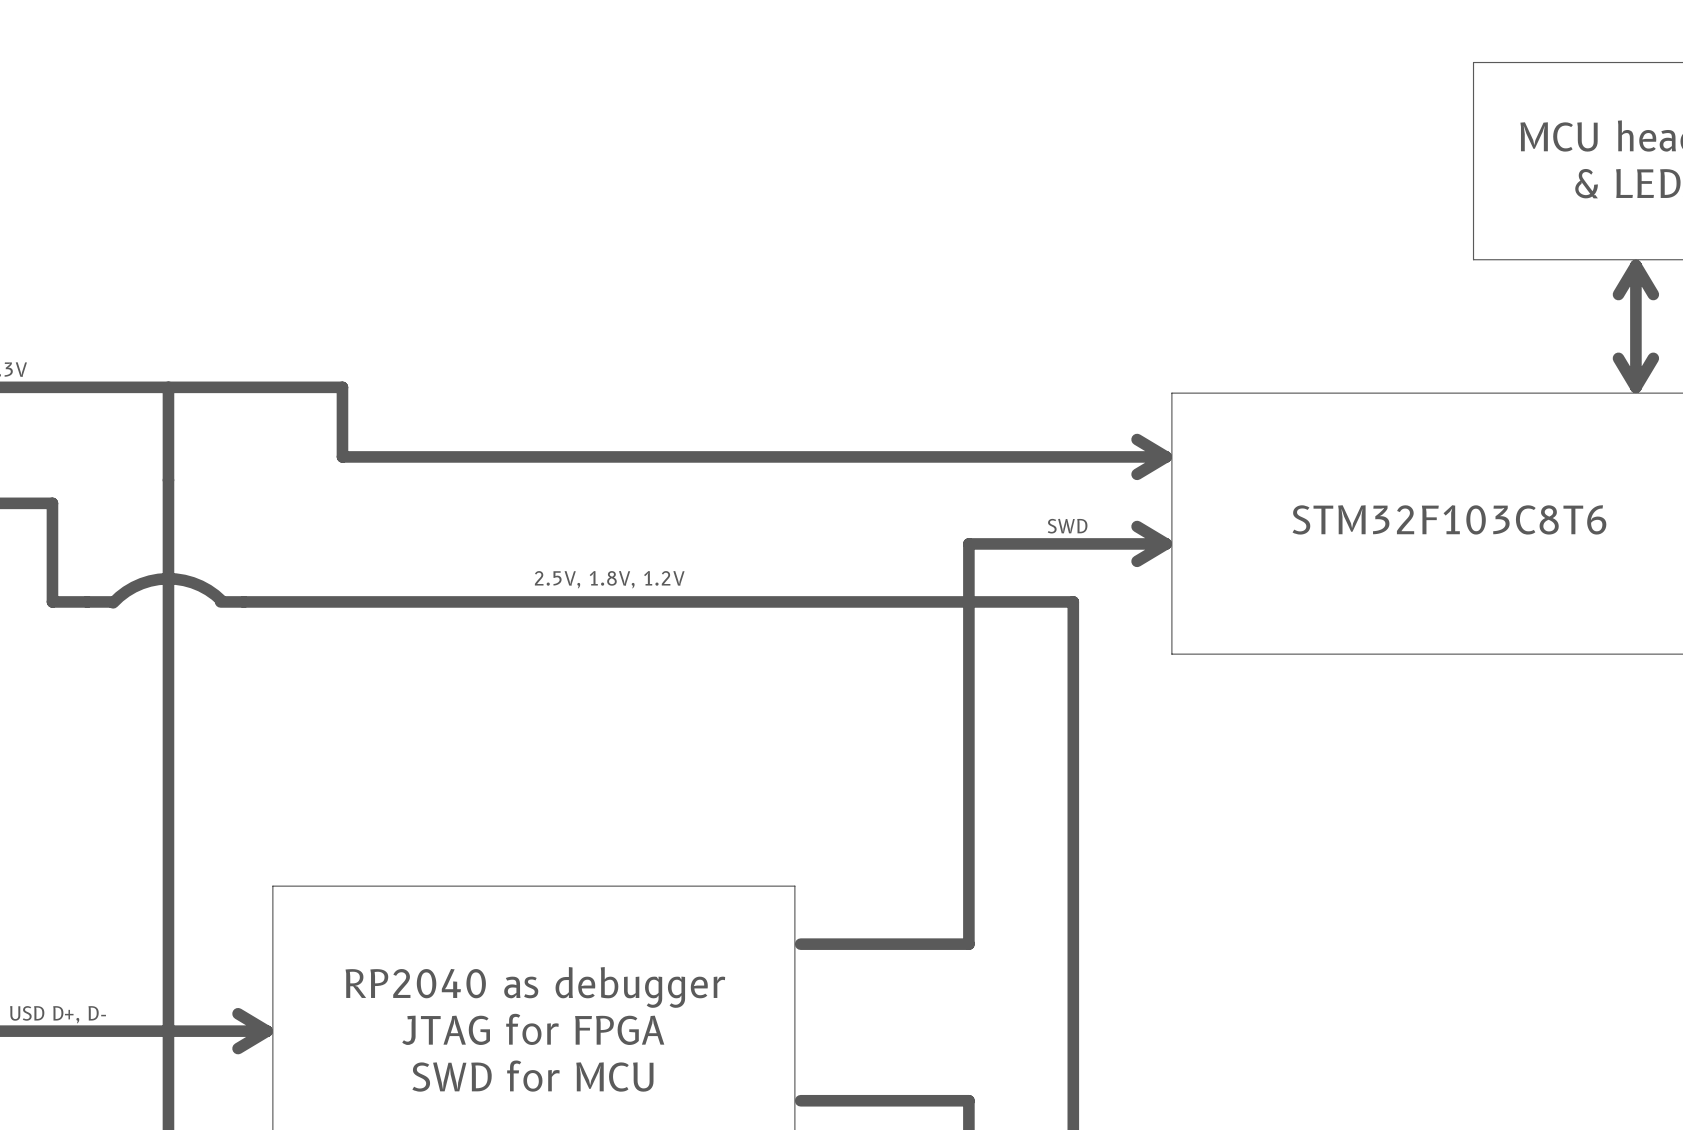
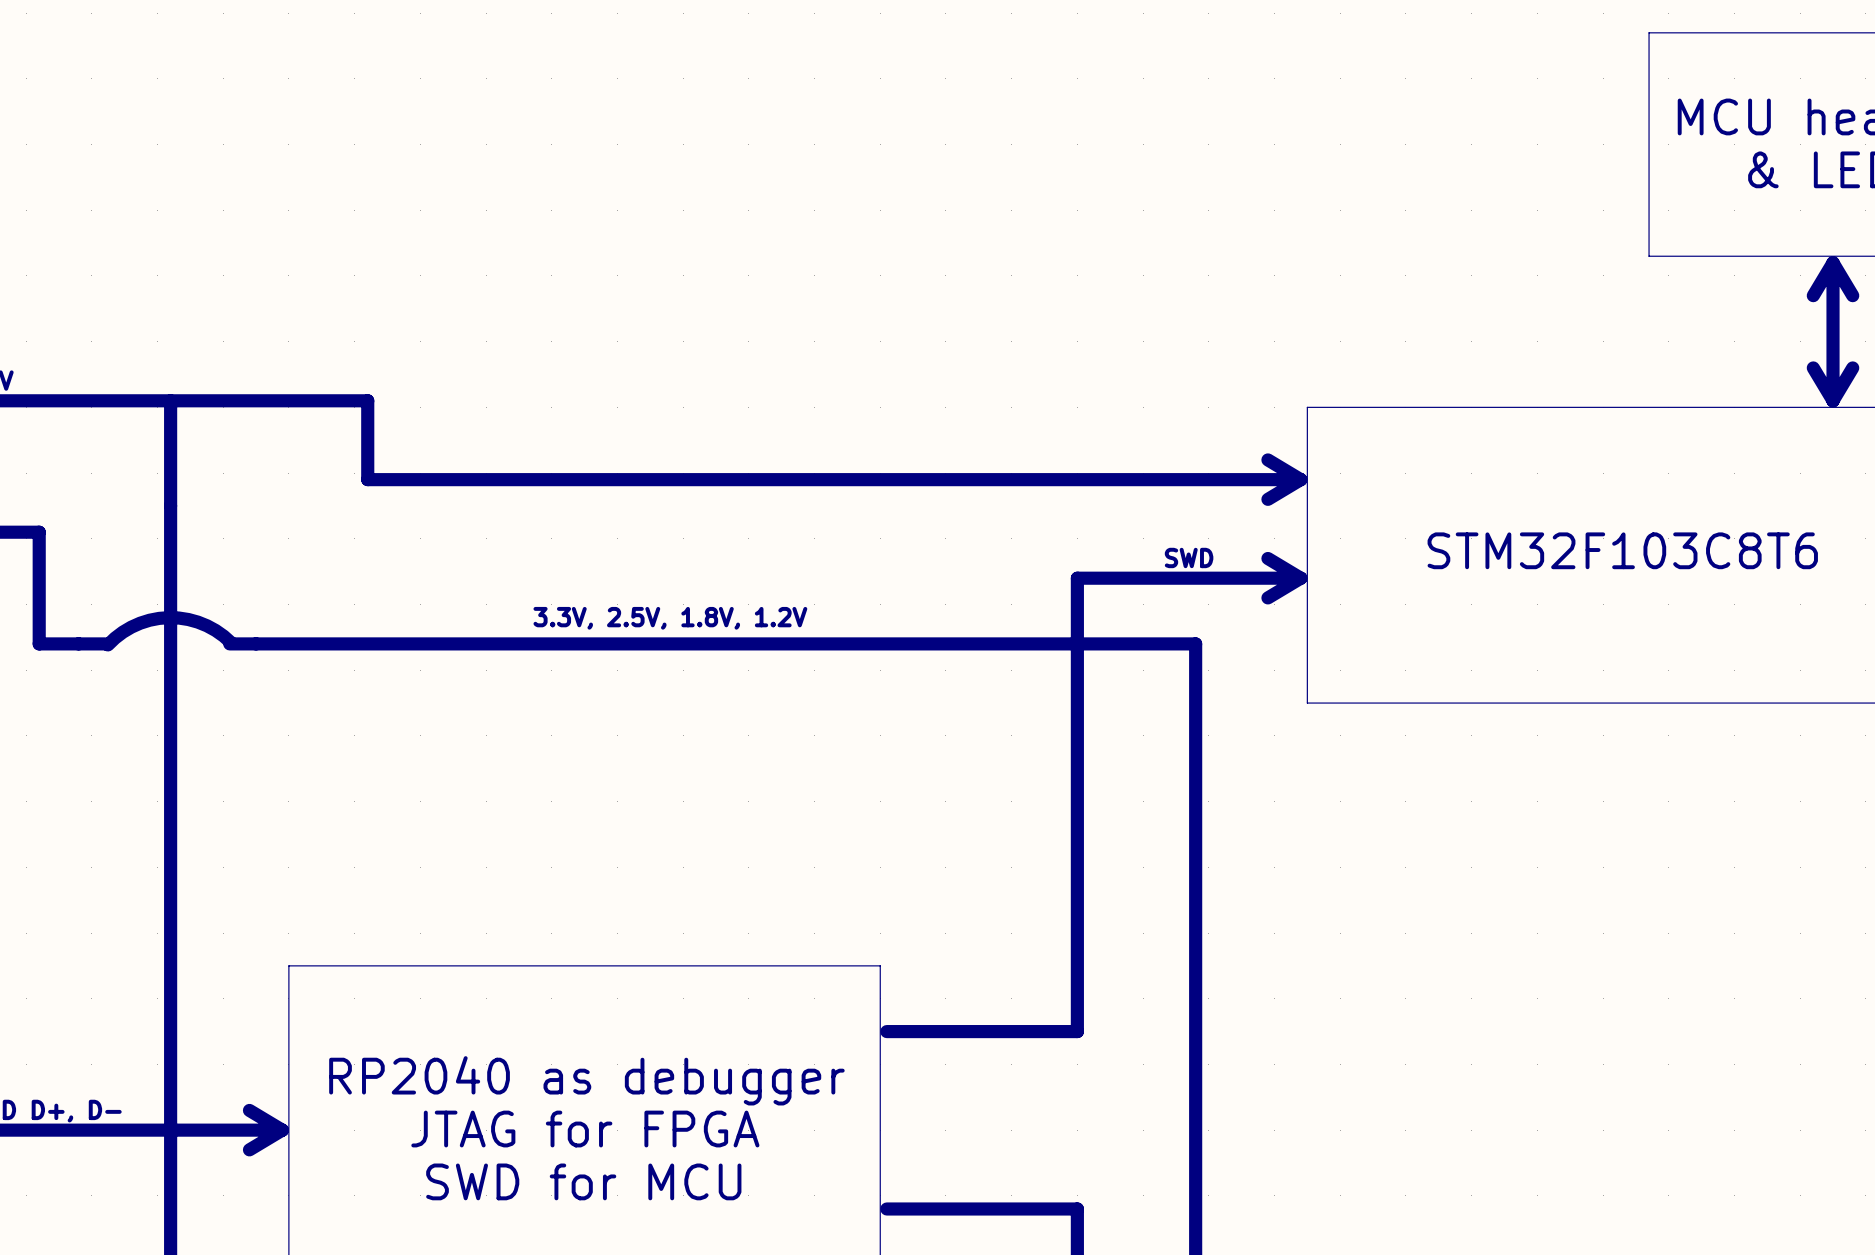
text: 2.5V, 1.8V, 1.2V (609, 579) -> 3.3V, 2.5V, 1.8V, 1.2V (670, 618)

